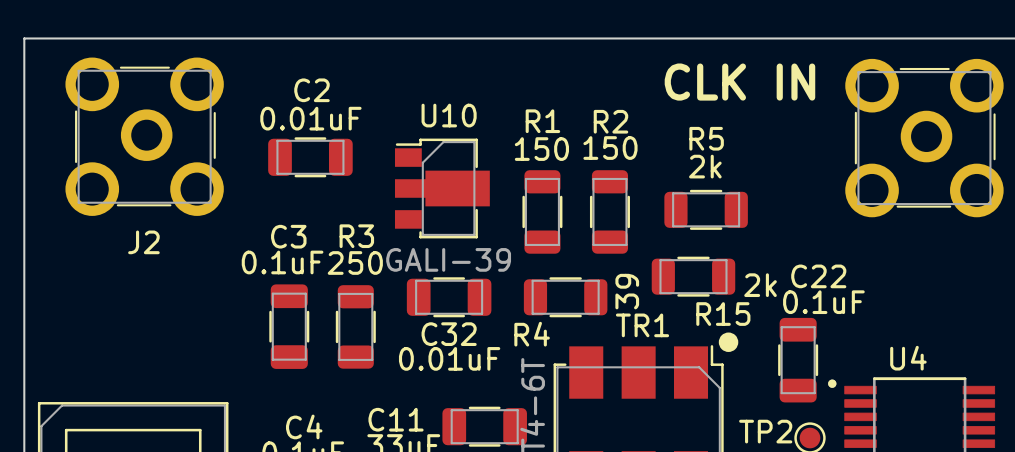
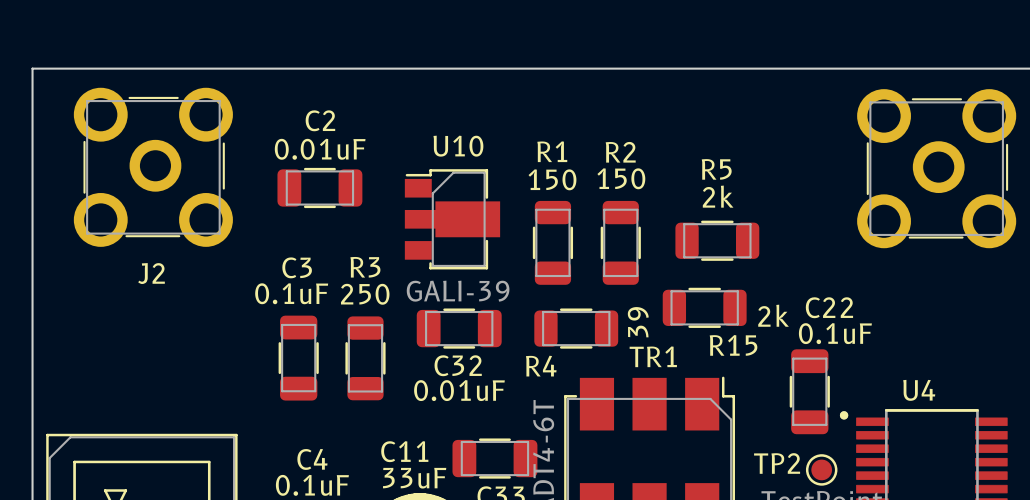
text: CLK IN (739, 82) -> none
drawing: [718, 332, 739, 352] -> none

